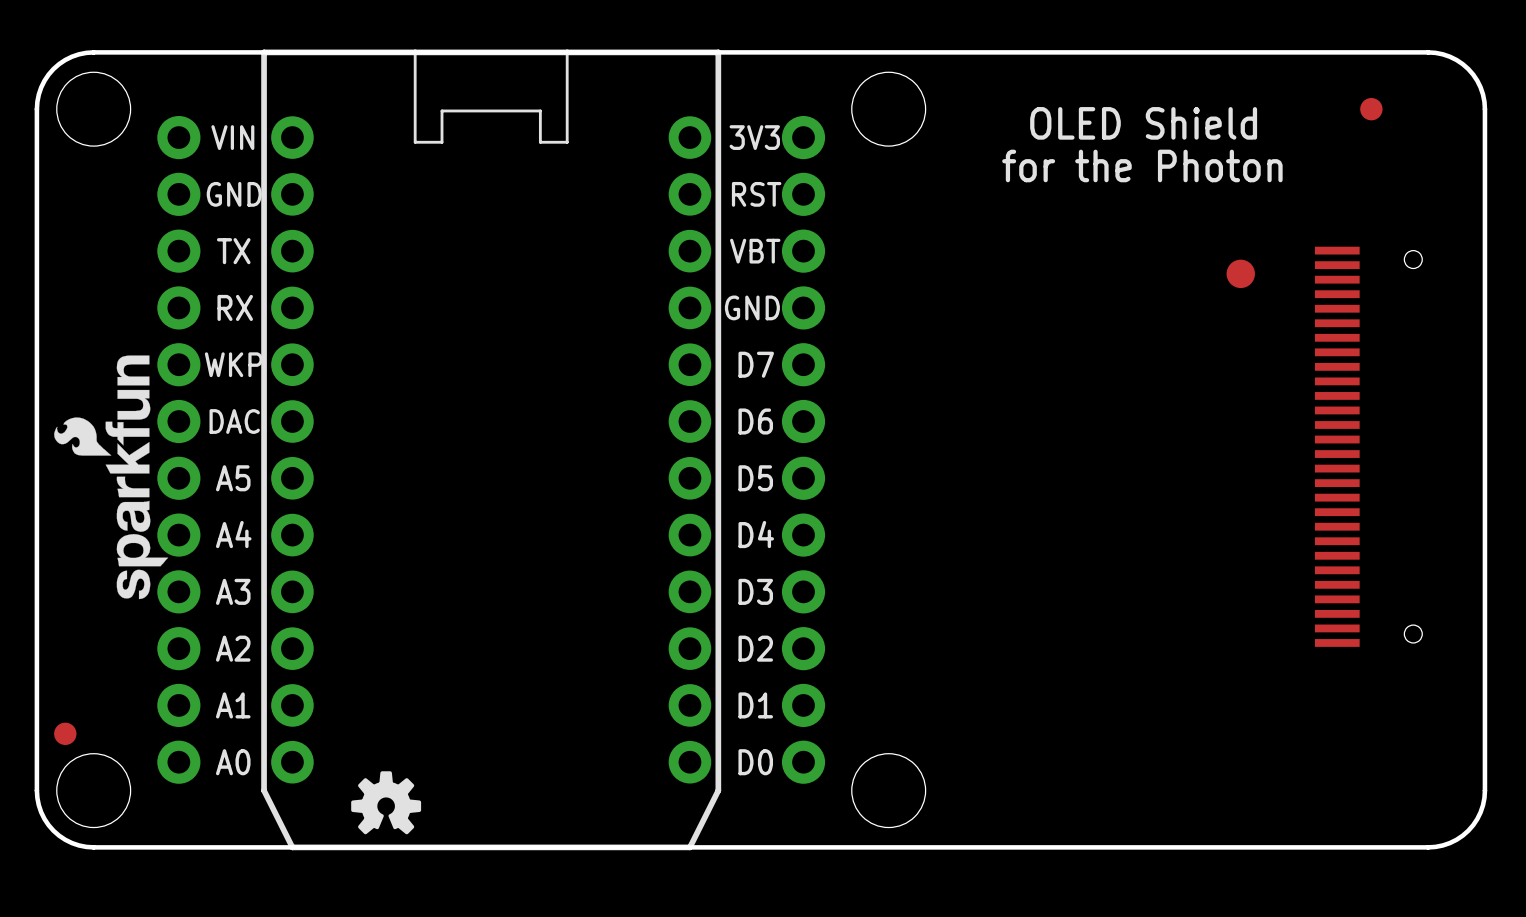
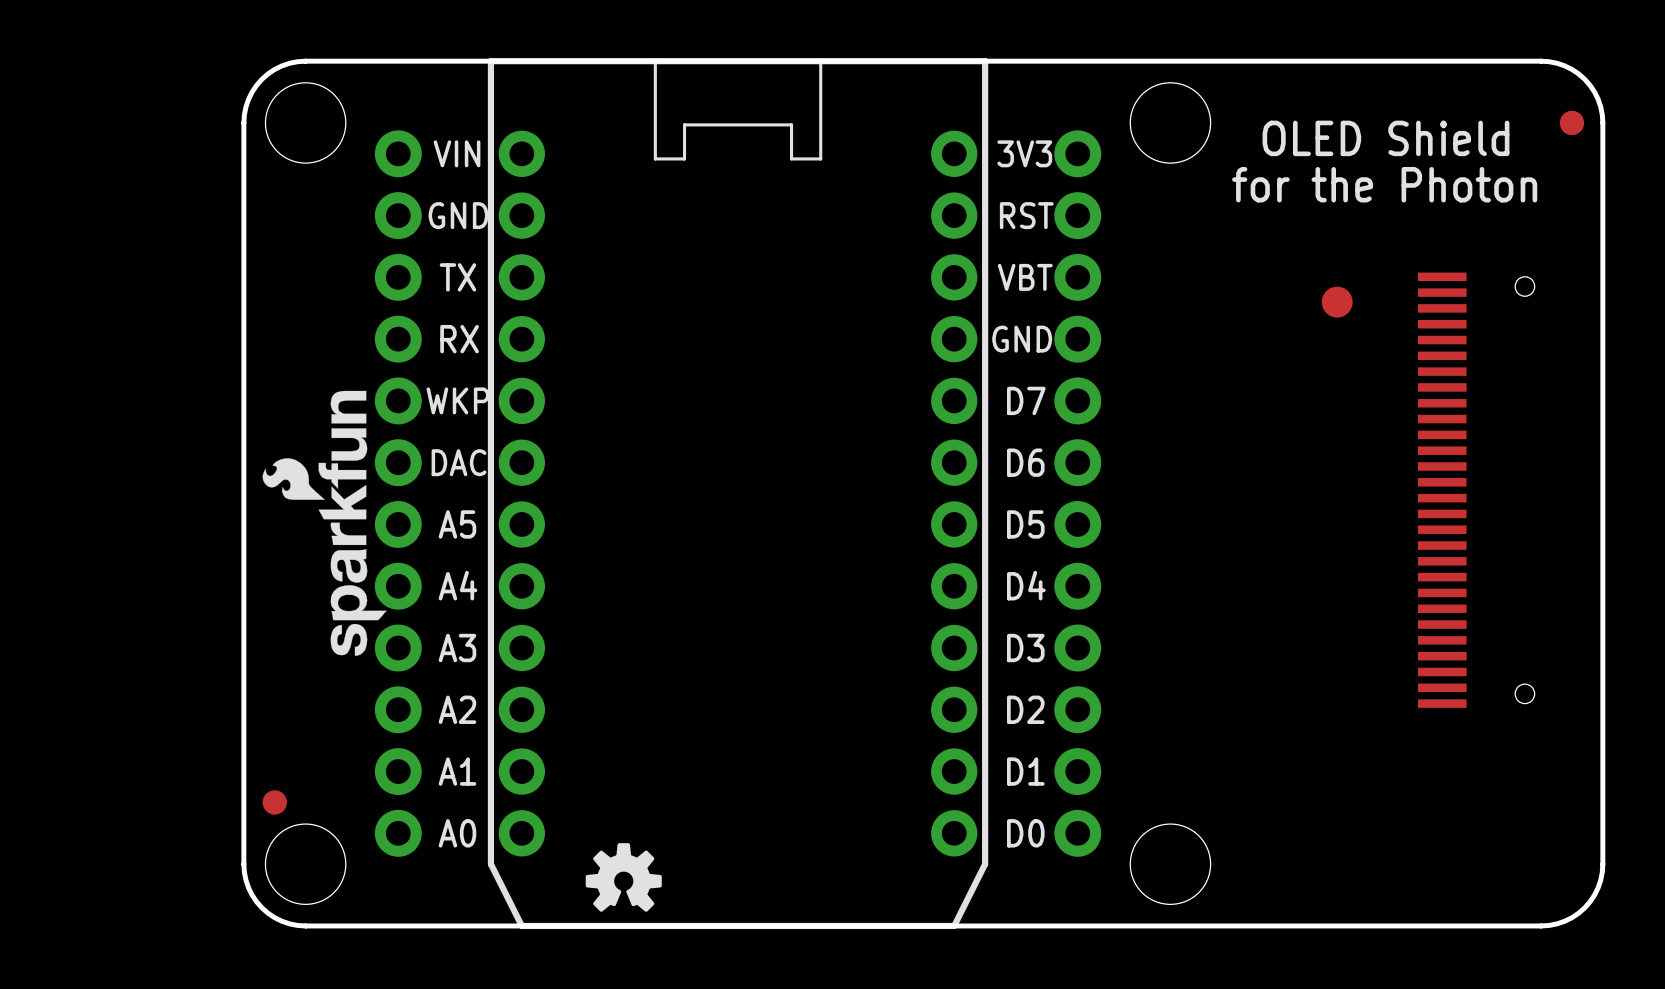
board edge: (292, 52) (93, 52) (78, 54) (59, 64) (48, 74) (38, 94) (36, 109) (36, 790) (41, 812) (48, 825) (59, 835) (71, 843) (86, 846) (292, 847) -> (305, 61) (281, 65) (261, 79) (248, 99) (243, 122) (244, 872) (248, 887) (261, 907) (281, 921) (305, 925)
part position: (1371, 109) -> (1571, 122)
text position: OLED Shield (1143, 123) -> OLED Shield (1385, 138)
text position: for the Photon (1142, 165) -> for the Photon (1384, 184)
part position: (491, 449) -> (738, 493)
drawing position: (111, 477) -> (324, 523)
part position: (65, 733) -> (274, 802)
drawing position: (386, 802) -> (623, 877)

